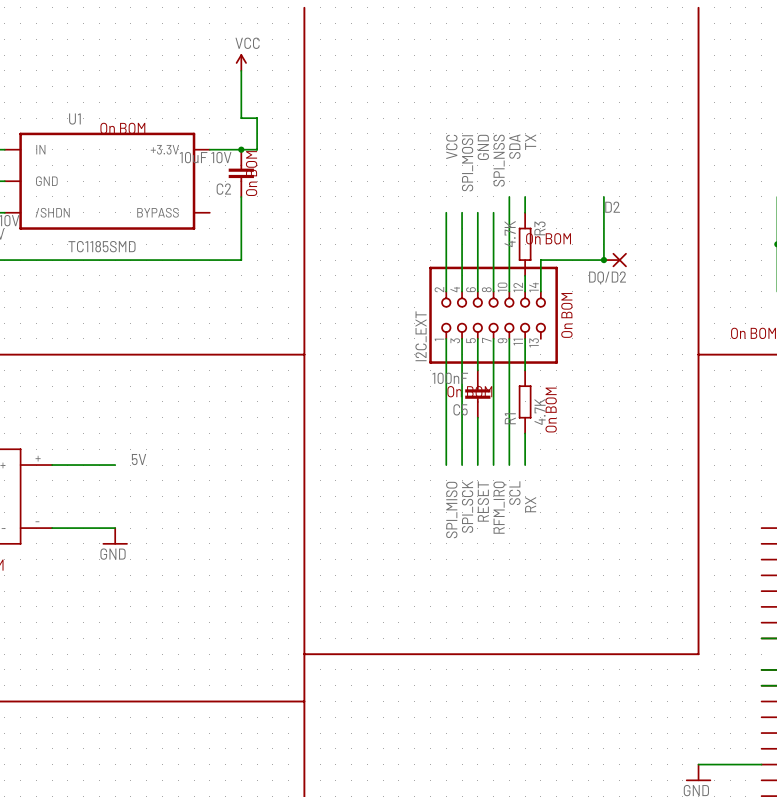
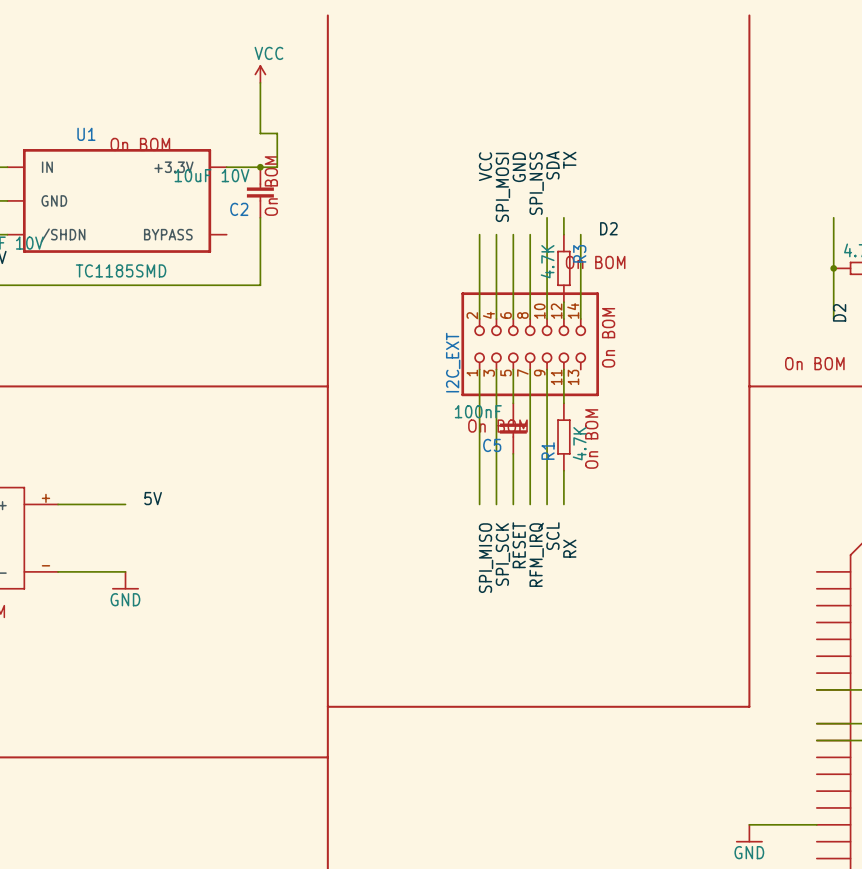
wire: (603, 196) (603, 260) (540, 260) -> (580, 234) (580, 285)
label position: D2 (612, 207) -> D2 (608, 228)
junction: (603, 260) -> none
DQ/D2: (615, 260) -> none

